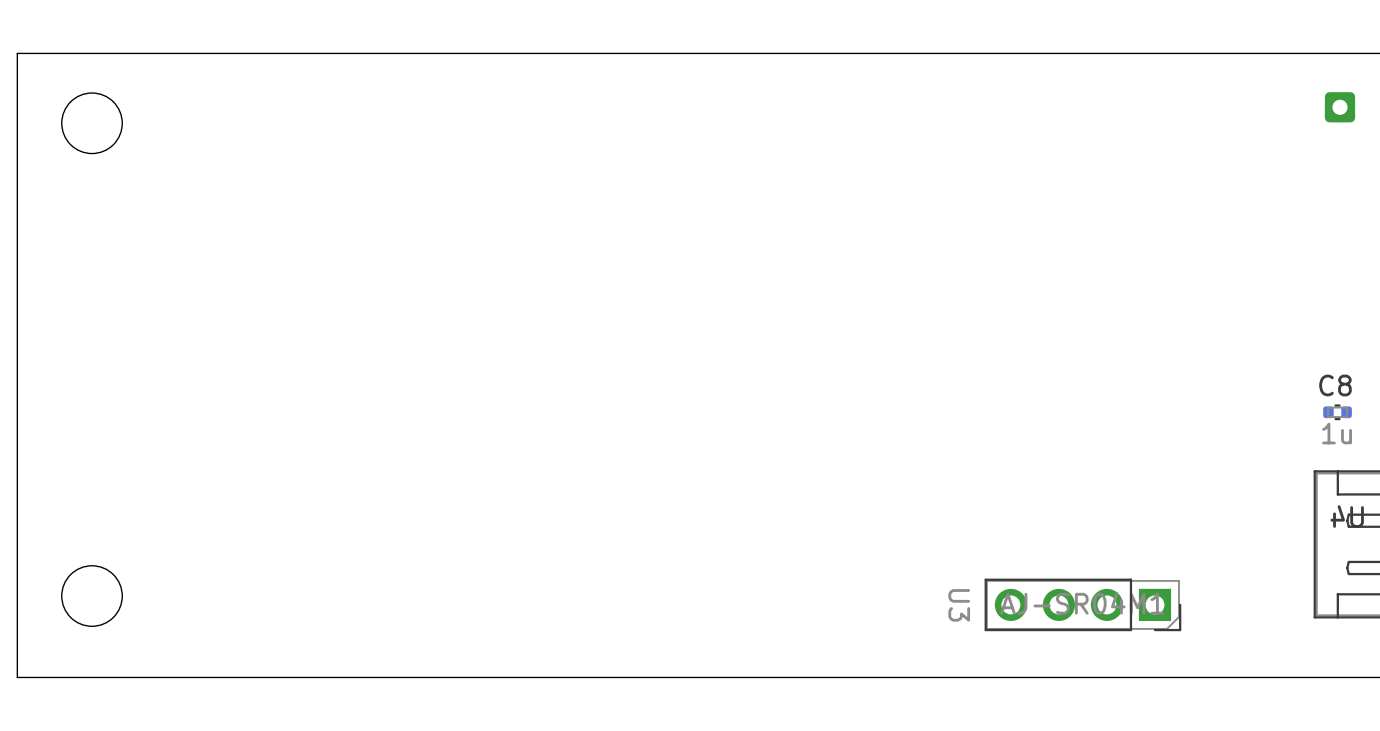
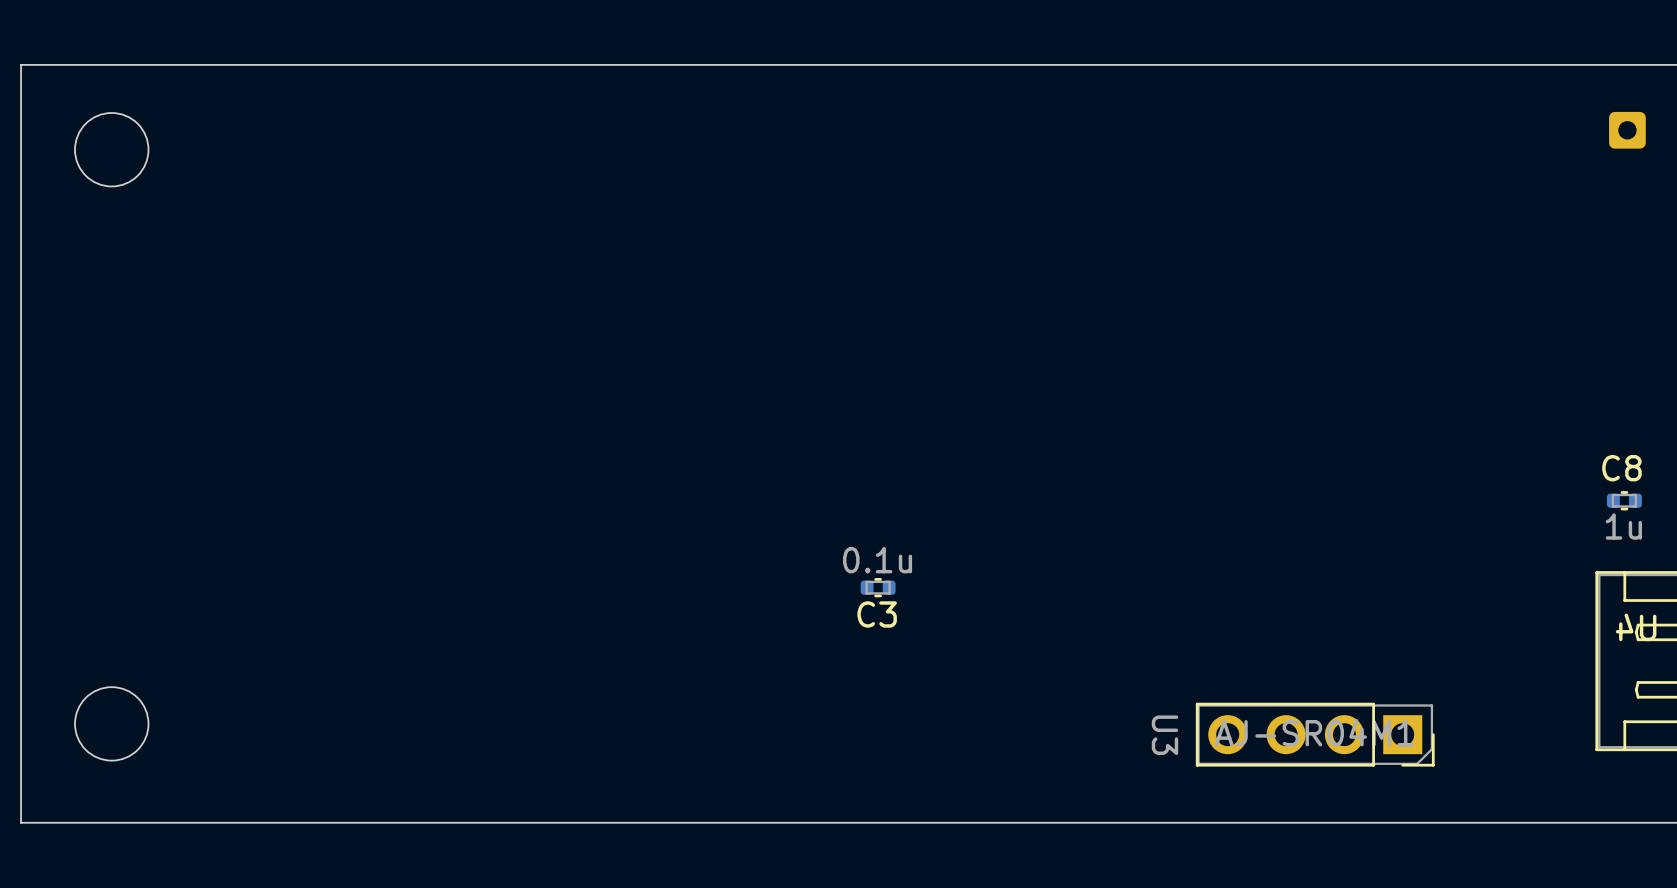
C3: none -> 0.1u (878, 587)

